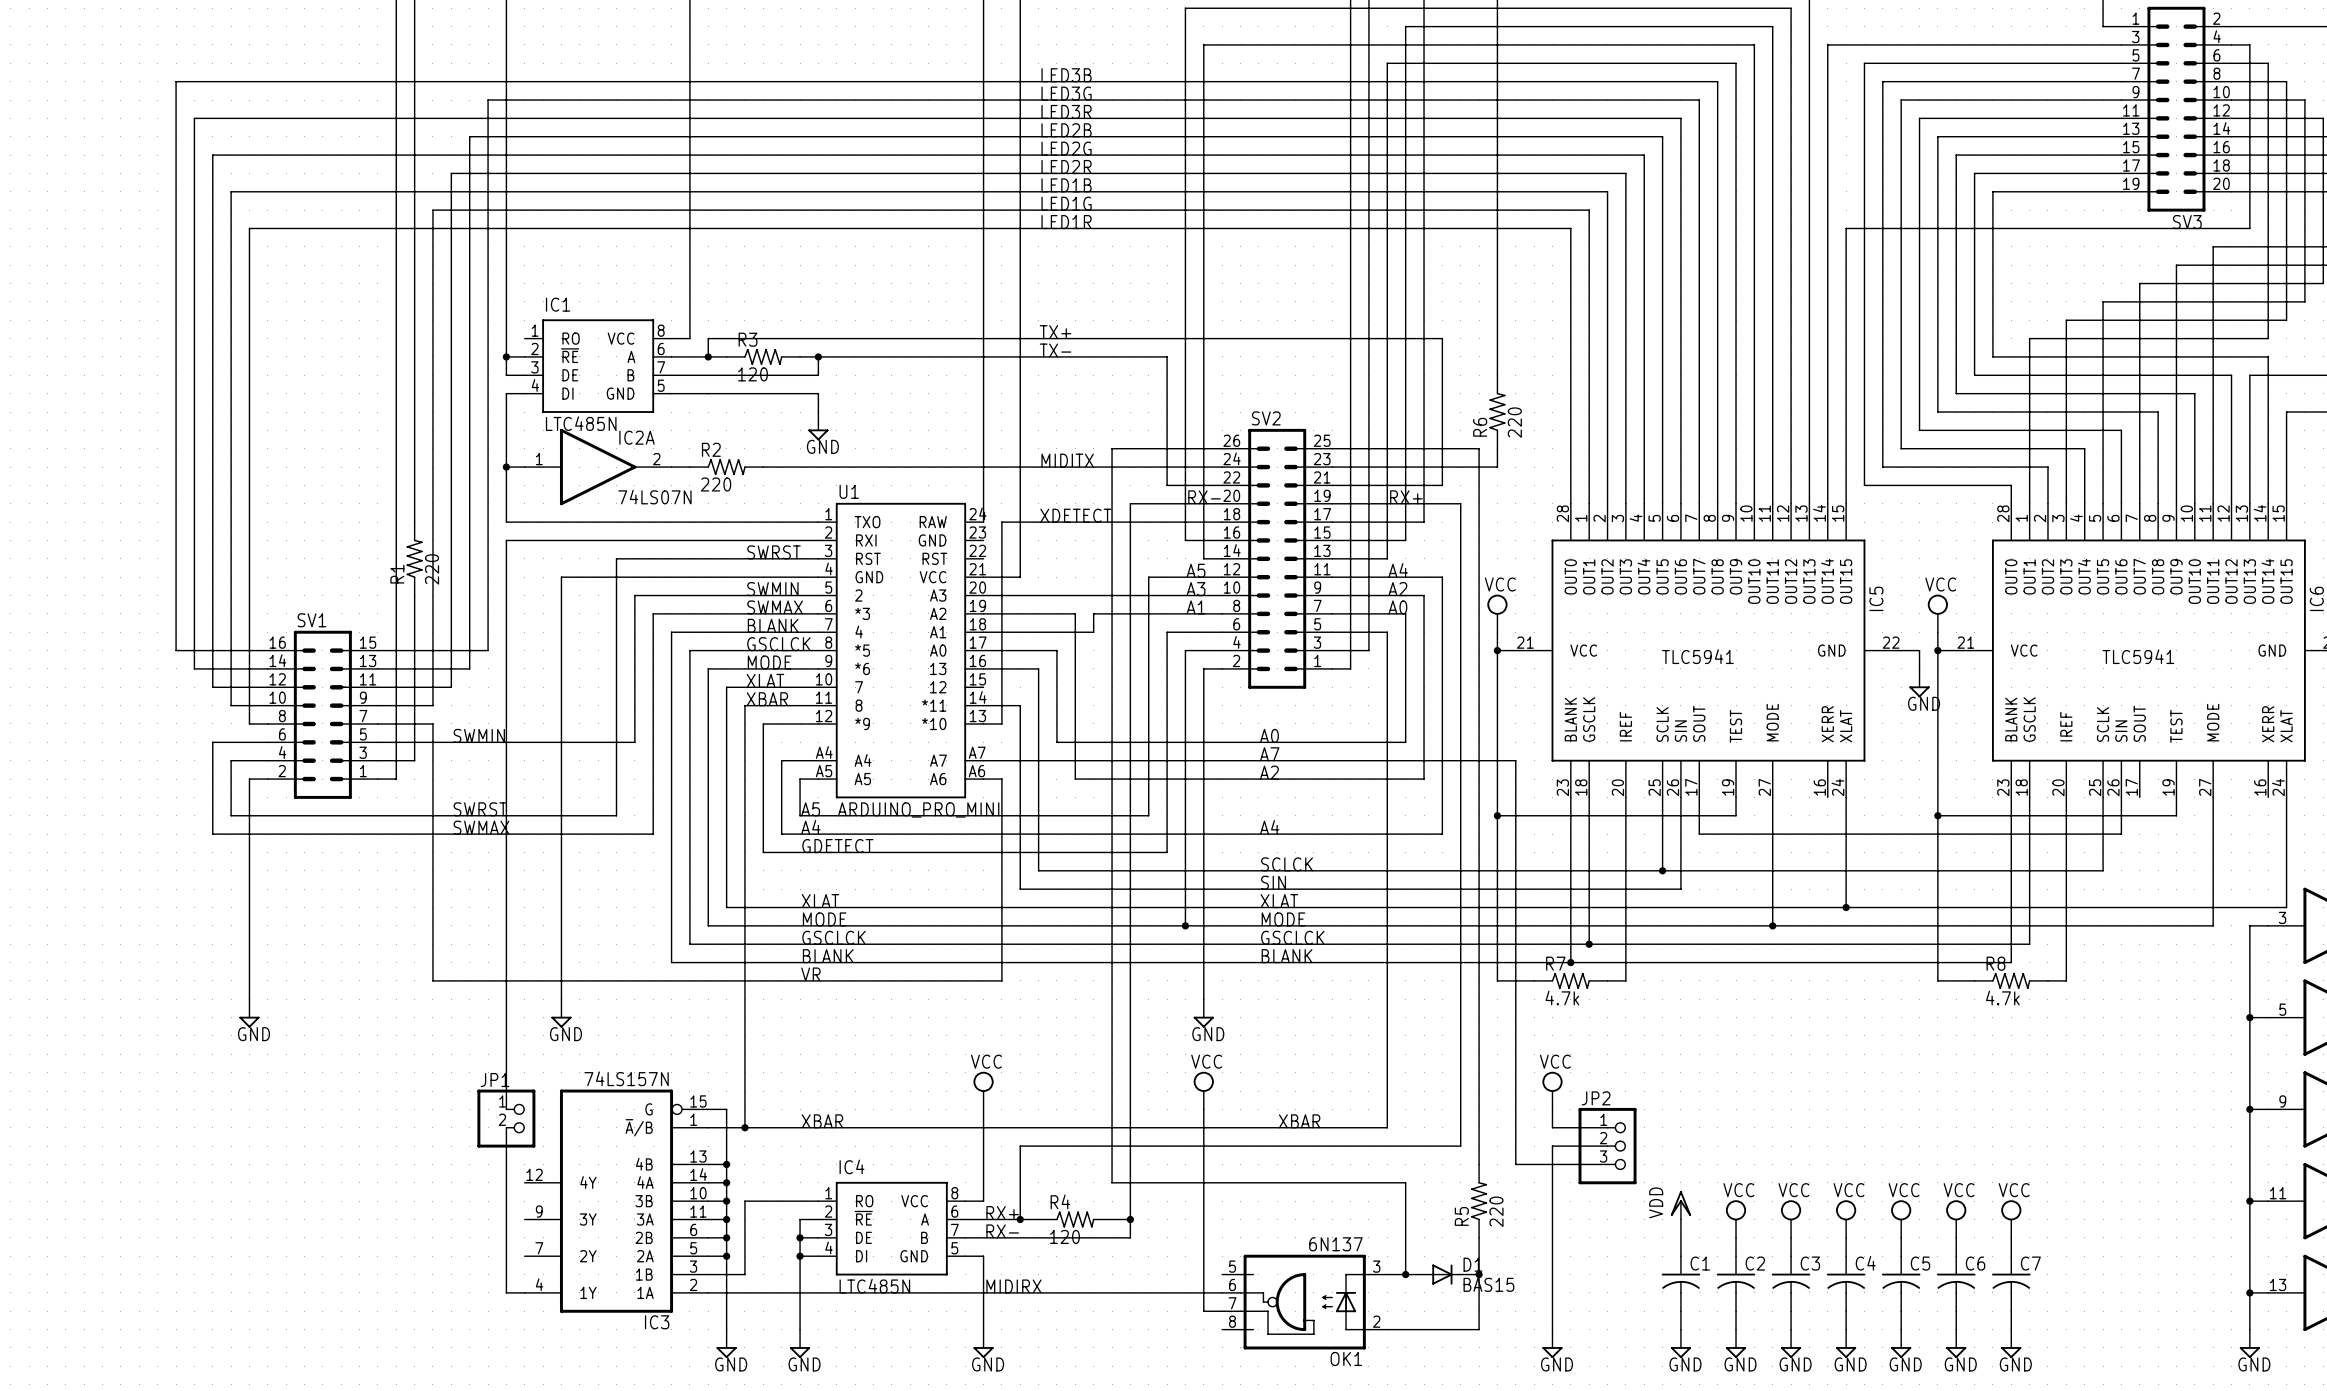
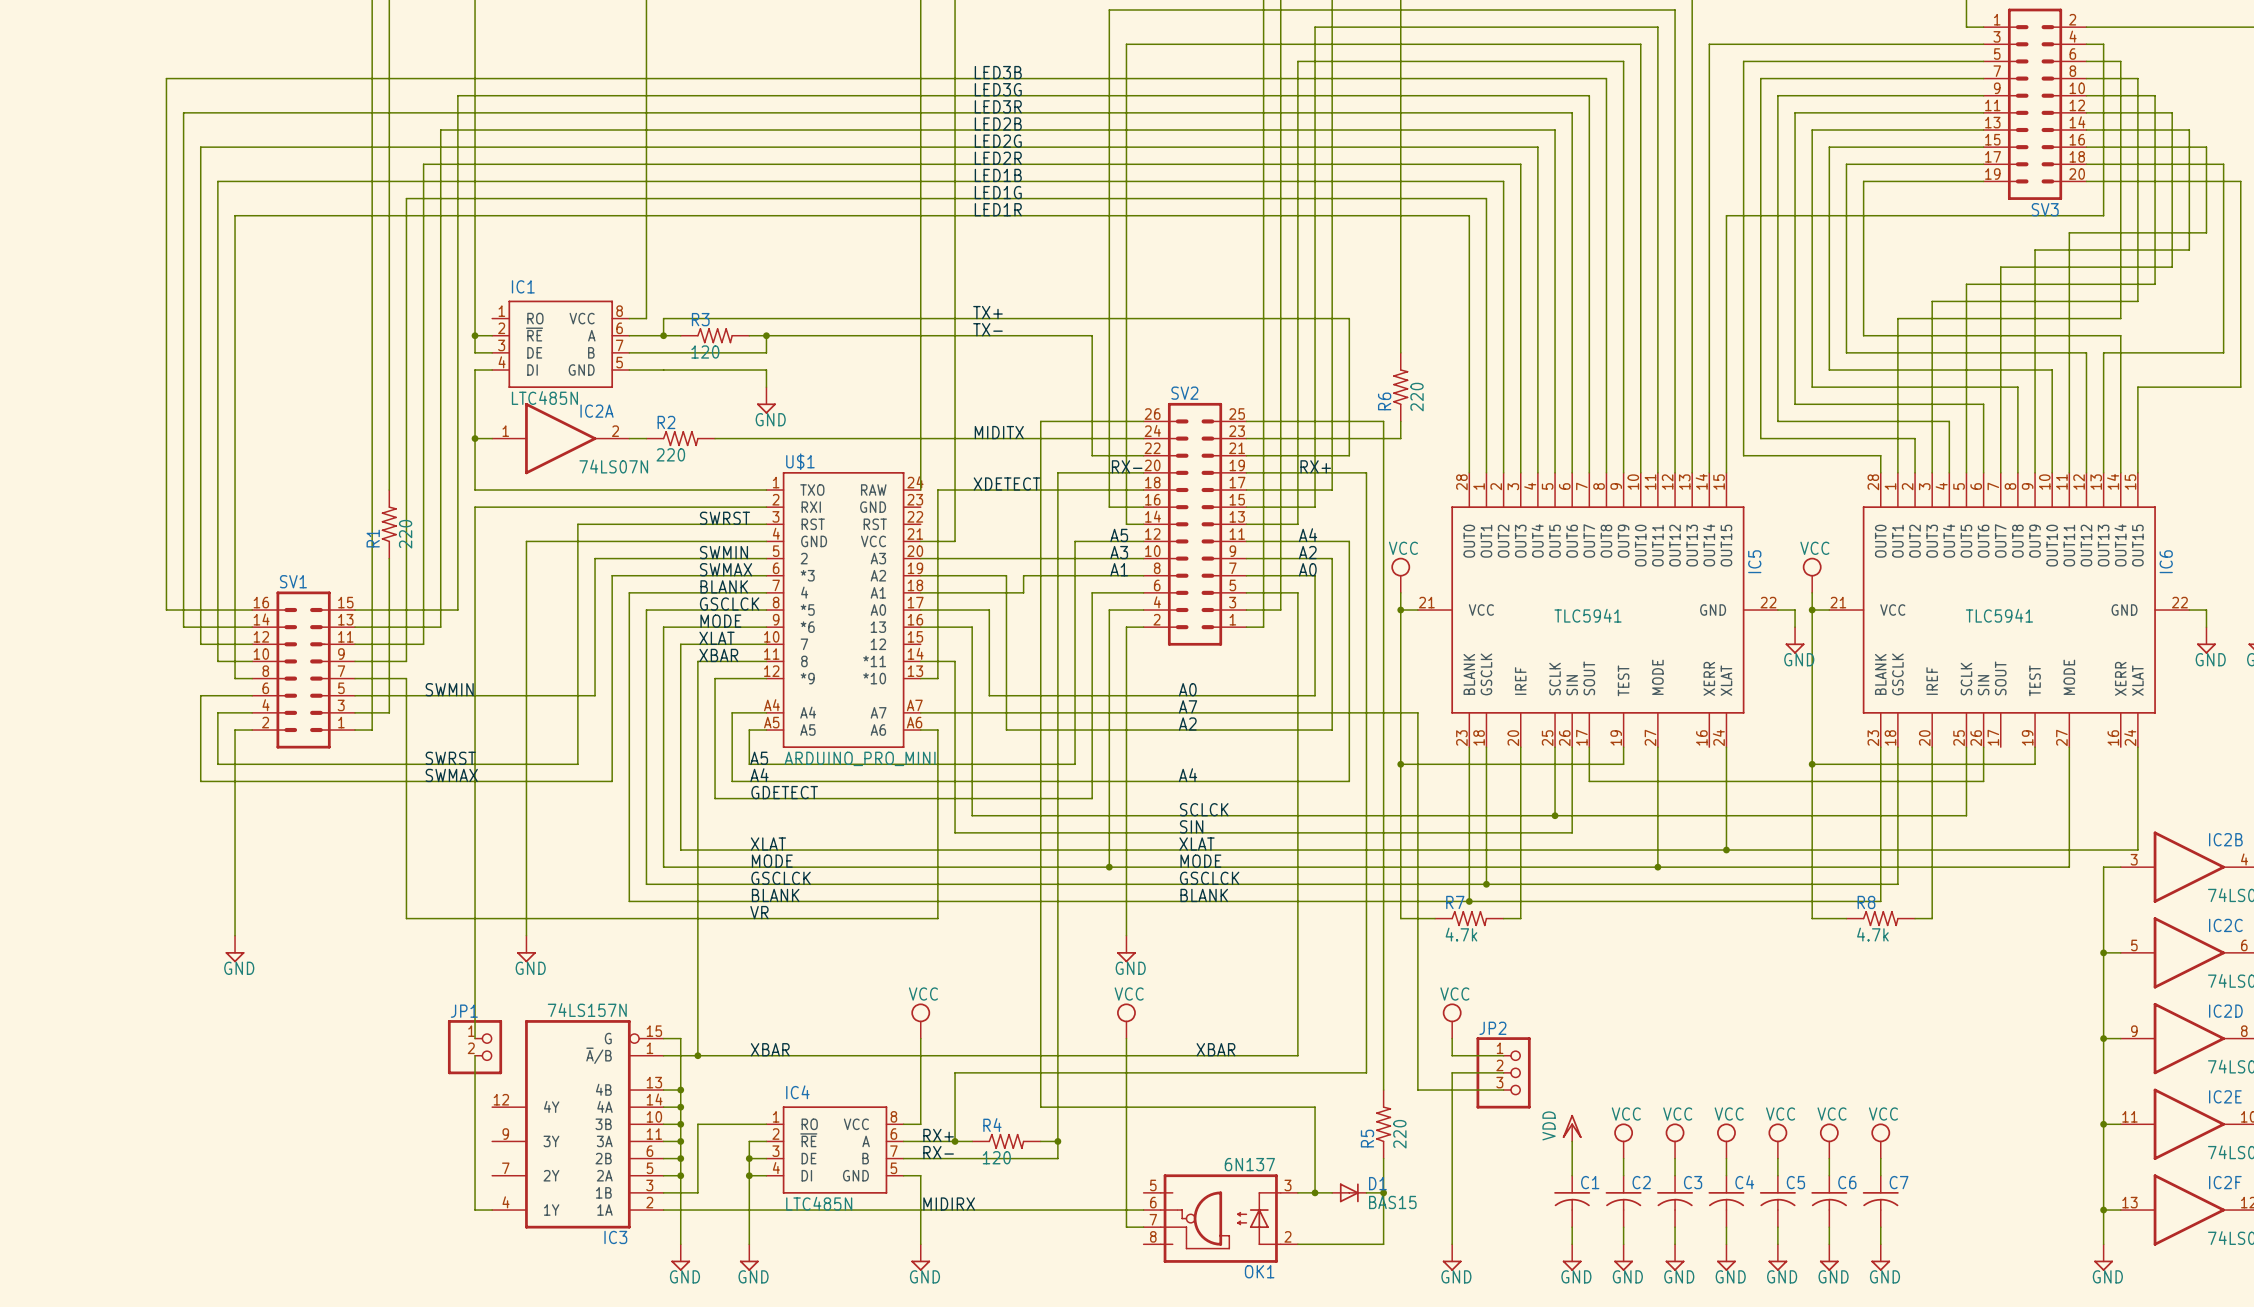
U1 name: U1 (849, 491) -> U$1 (800, 461)

